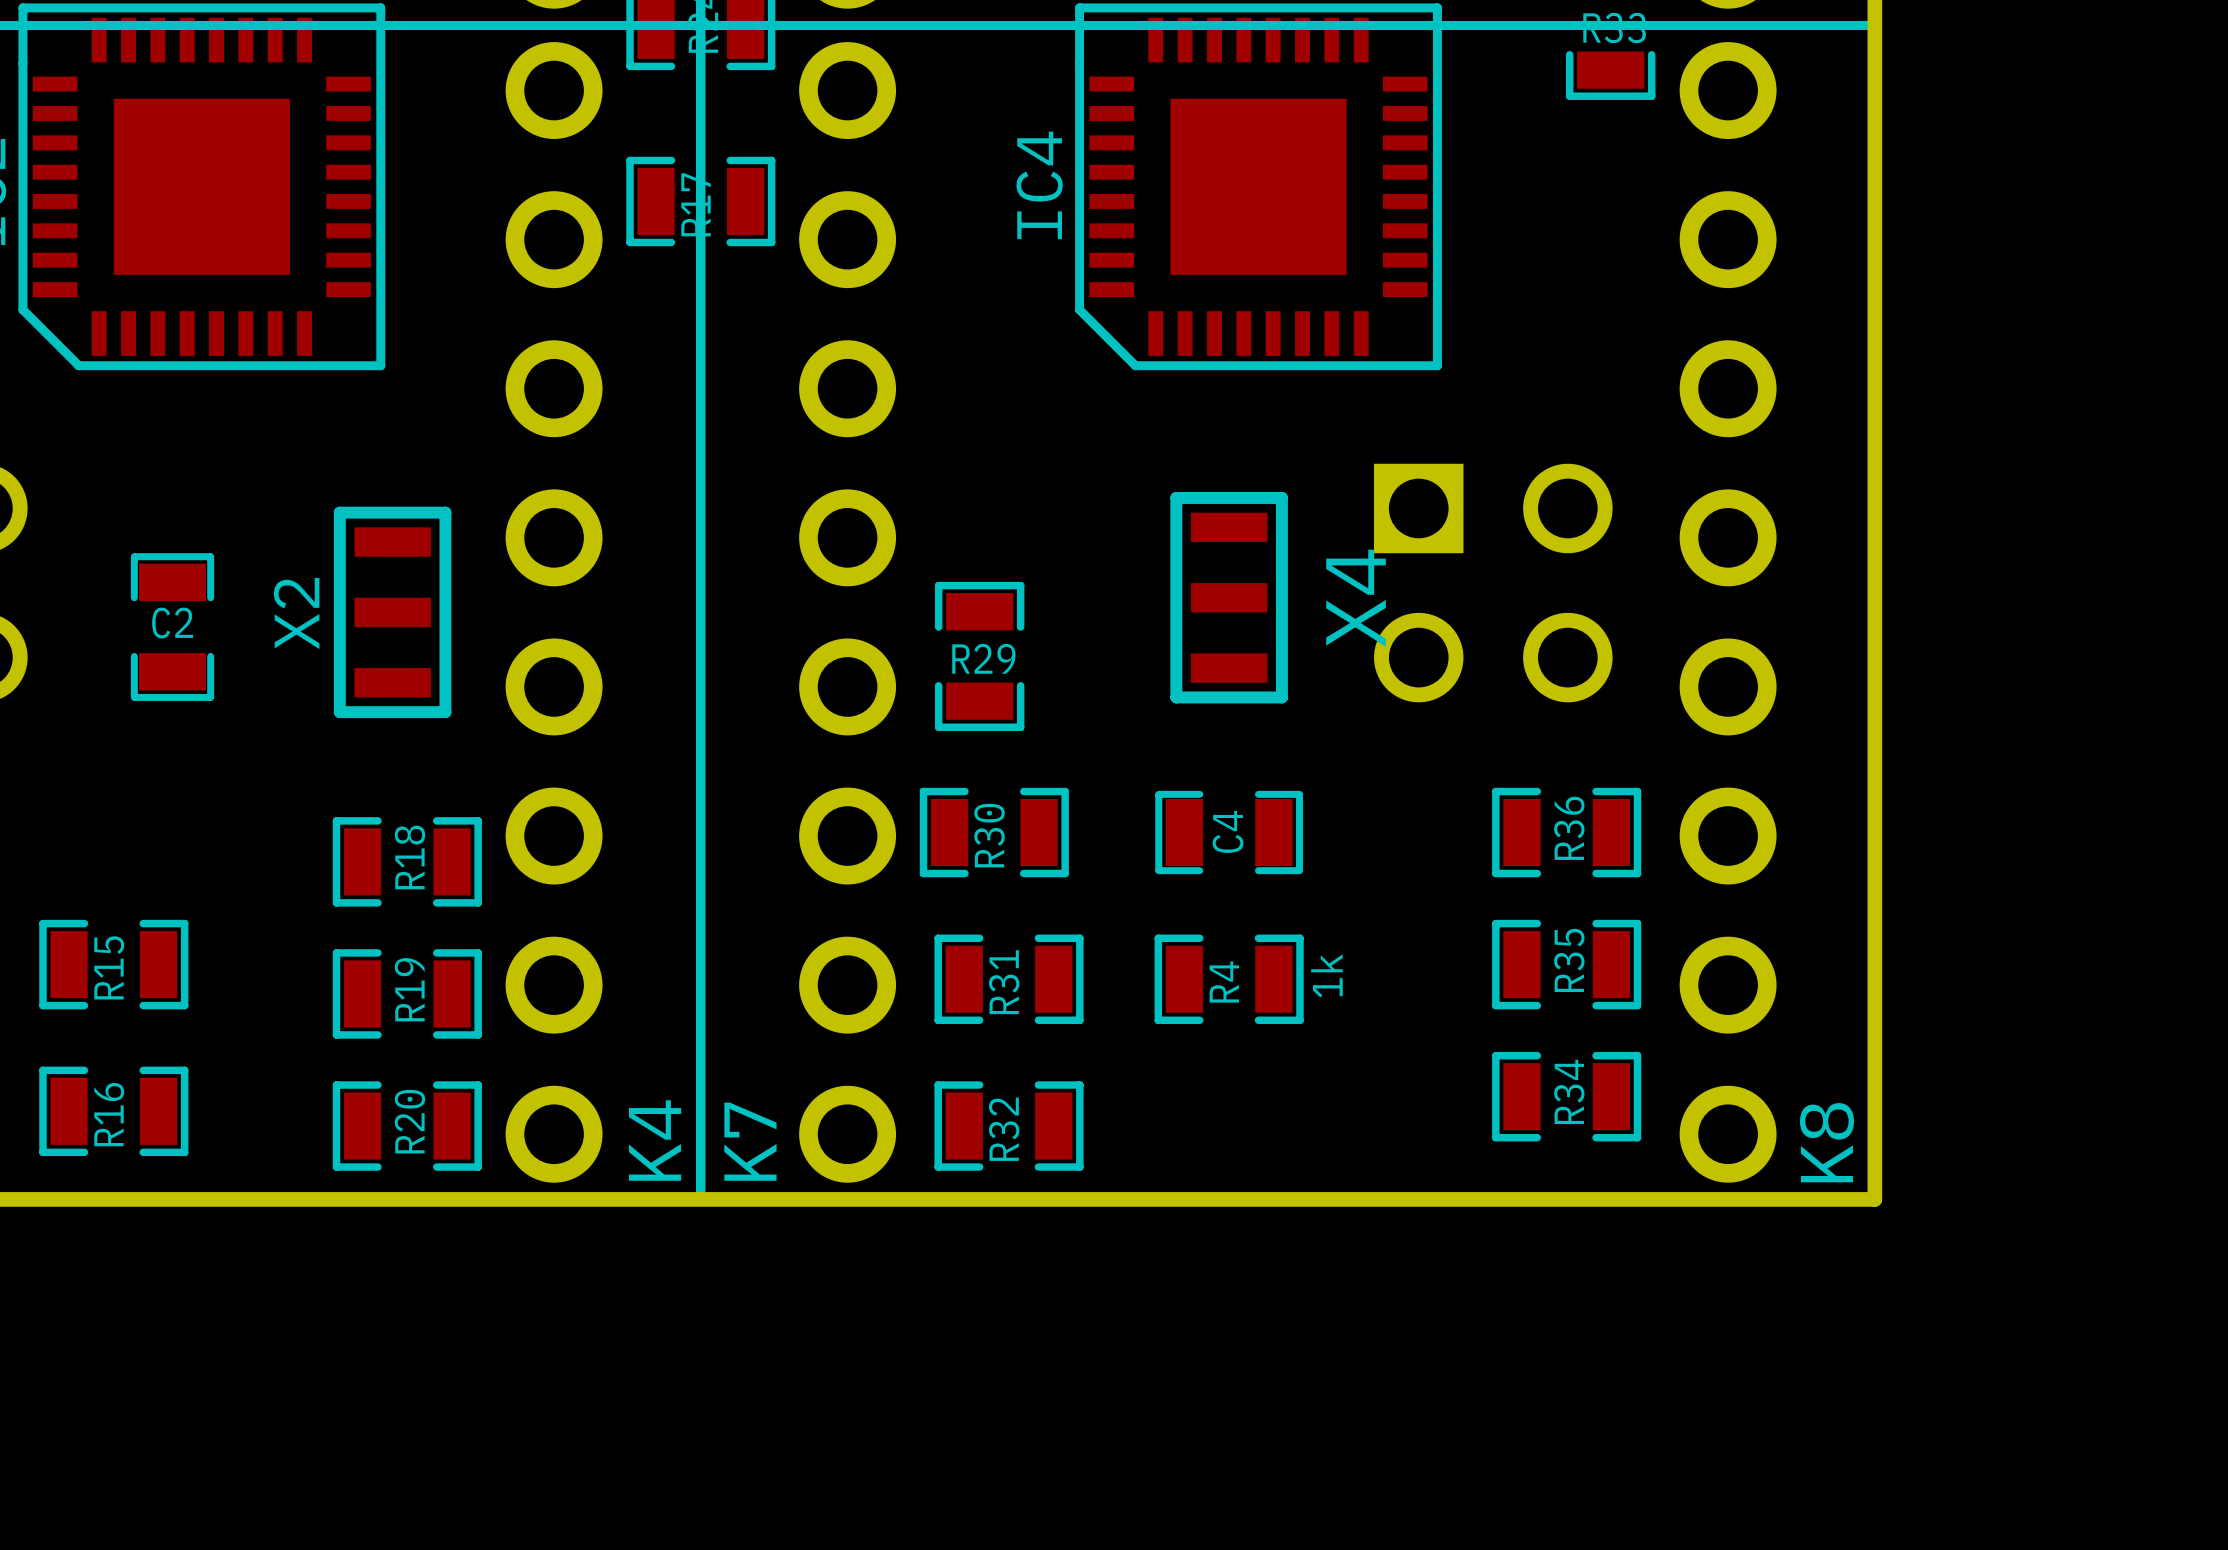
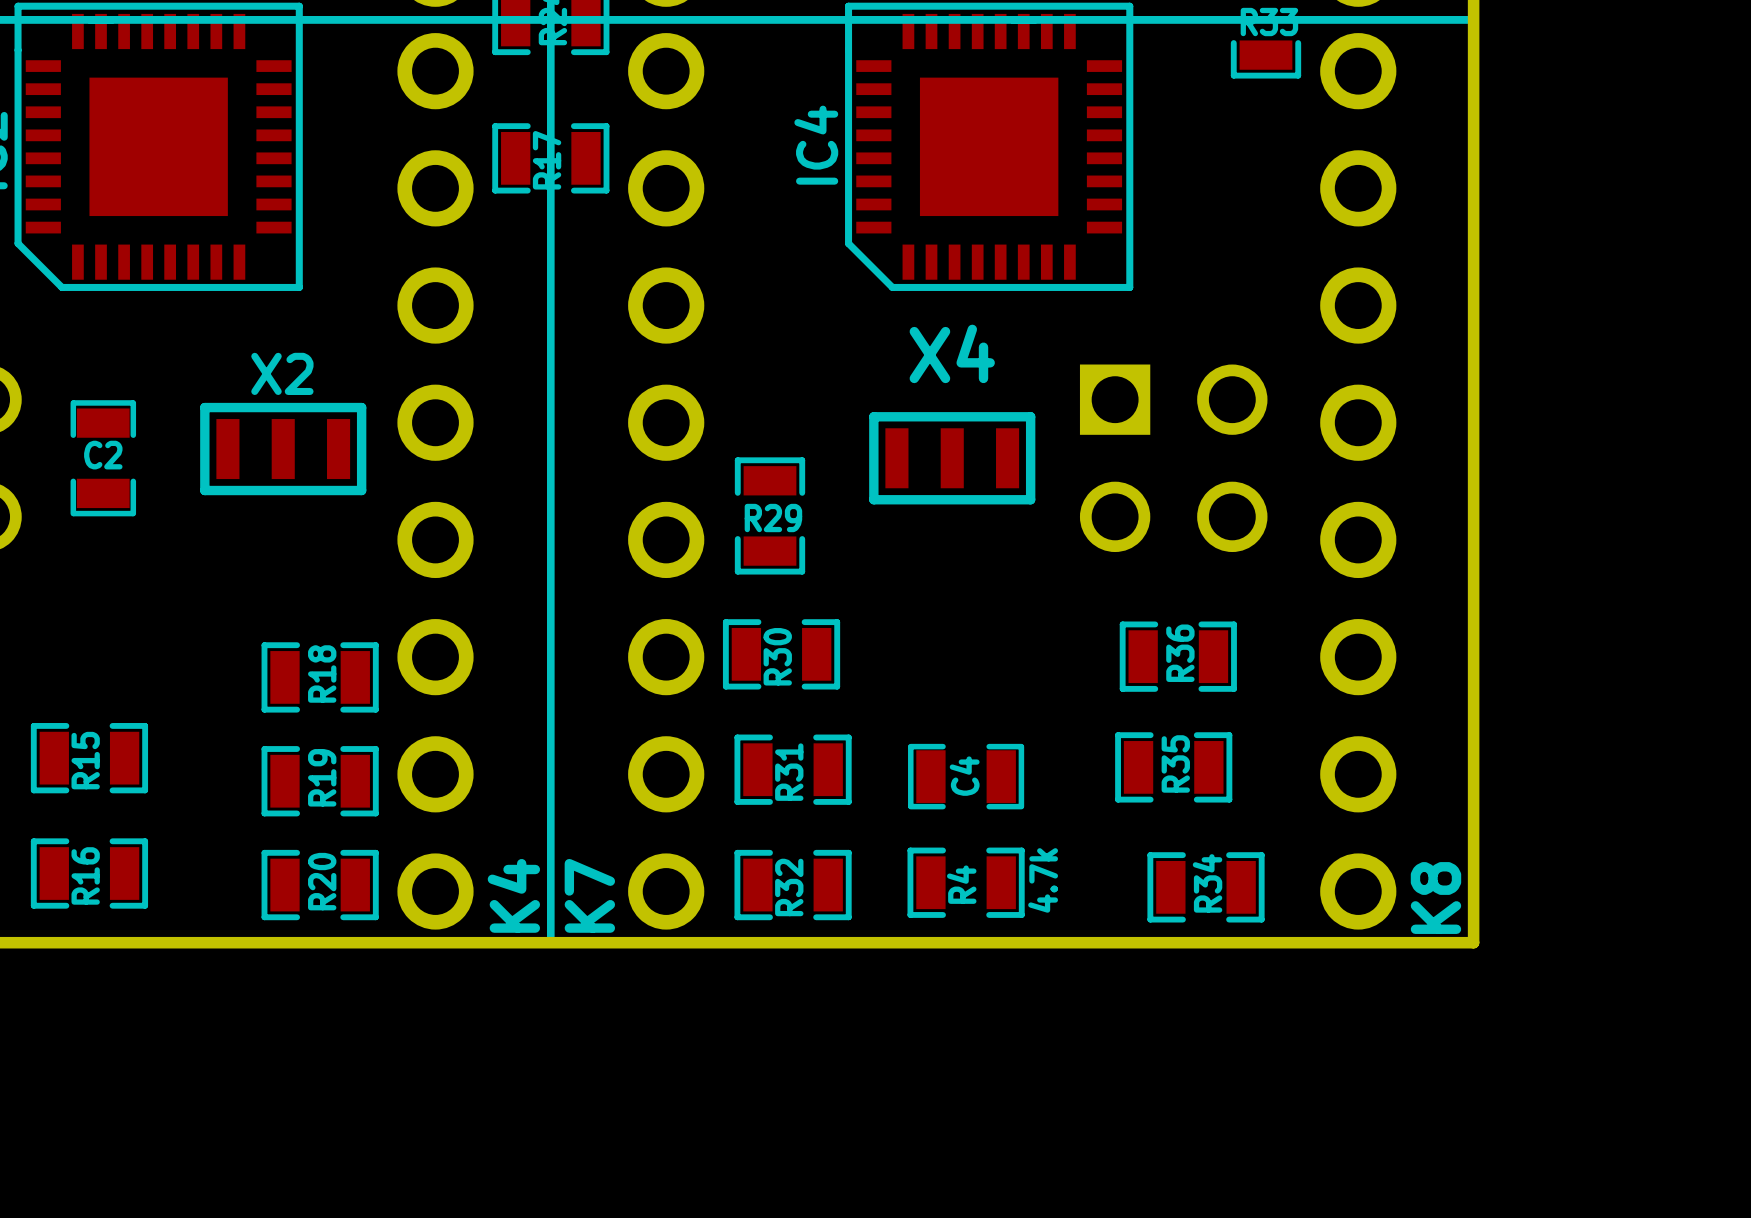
X4 rotation: 0° (1229, 597) -> 90° clockwise (952, 458)
X4 name position: X4 (1356, 598) -> X4 (952, 353)
X2 rotation: 0° (392, 612) -> 90° clockwise (283, 449)
C2 position: (172, 627) -> (103, 458)
C4 position: (1229, 832) -> (966, 776)
R36 position: (1566, 832) -> (1178, 656)
R35 position: (1566, 964) -> (1173, 767)
R4 value: 1k (1326, 975) -> 4.7k (1043, 880)
R4 position: (1229, 979) -> (966, 882)
R34 position: (1566, 1096) -> (1206, 887)

